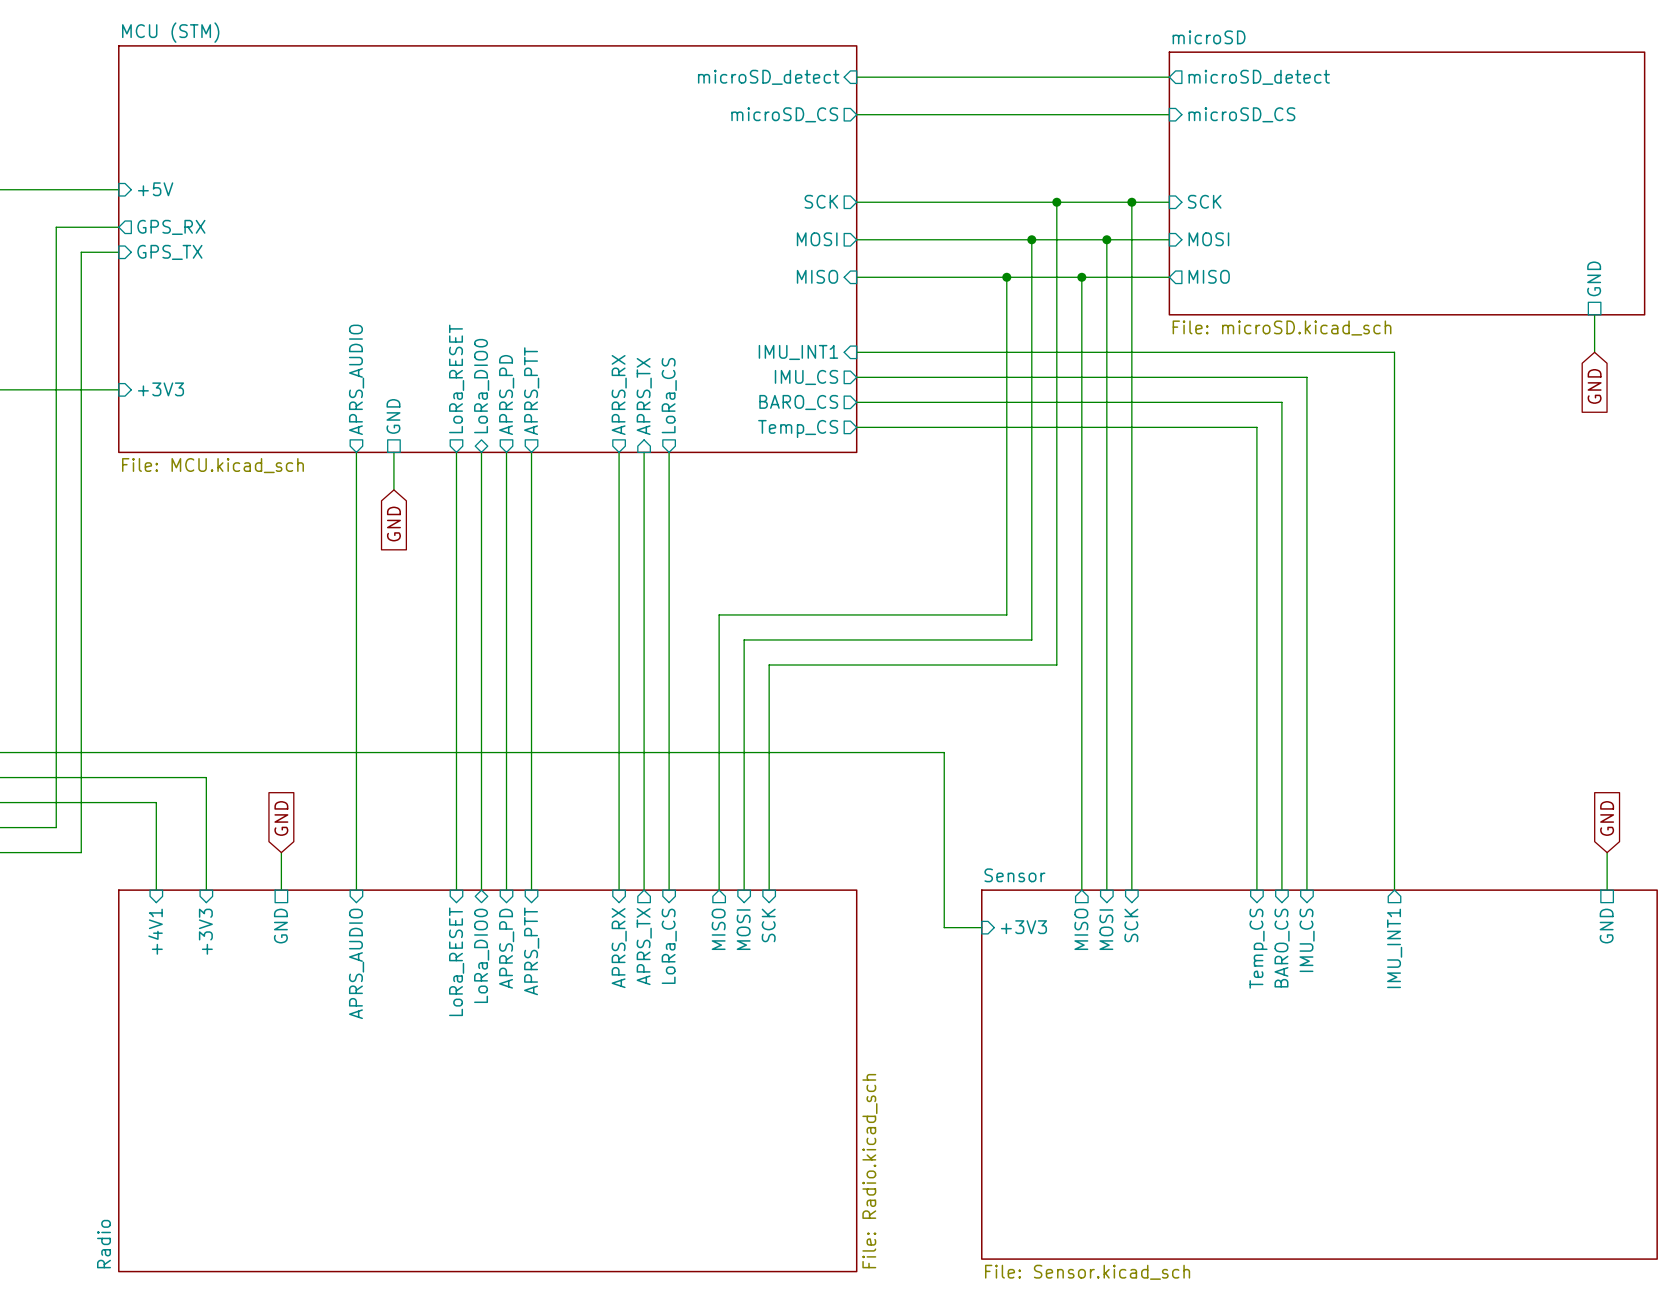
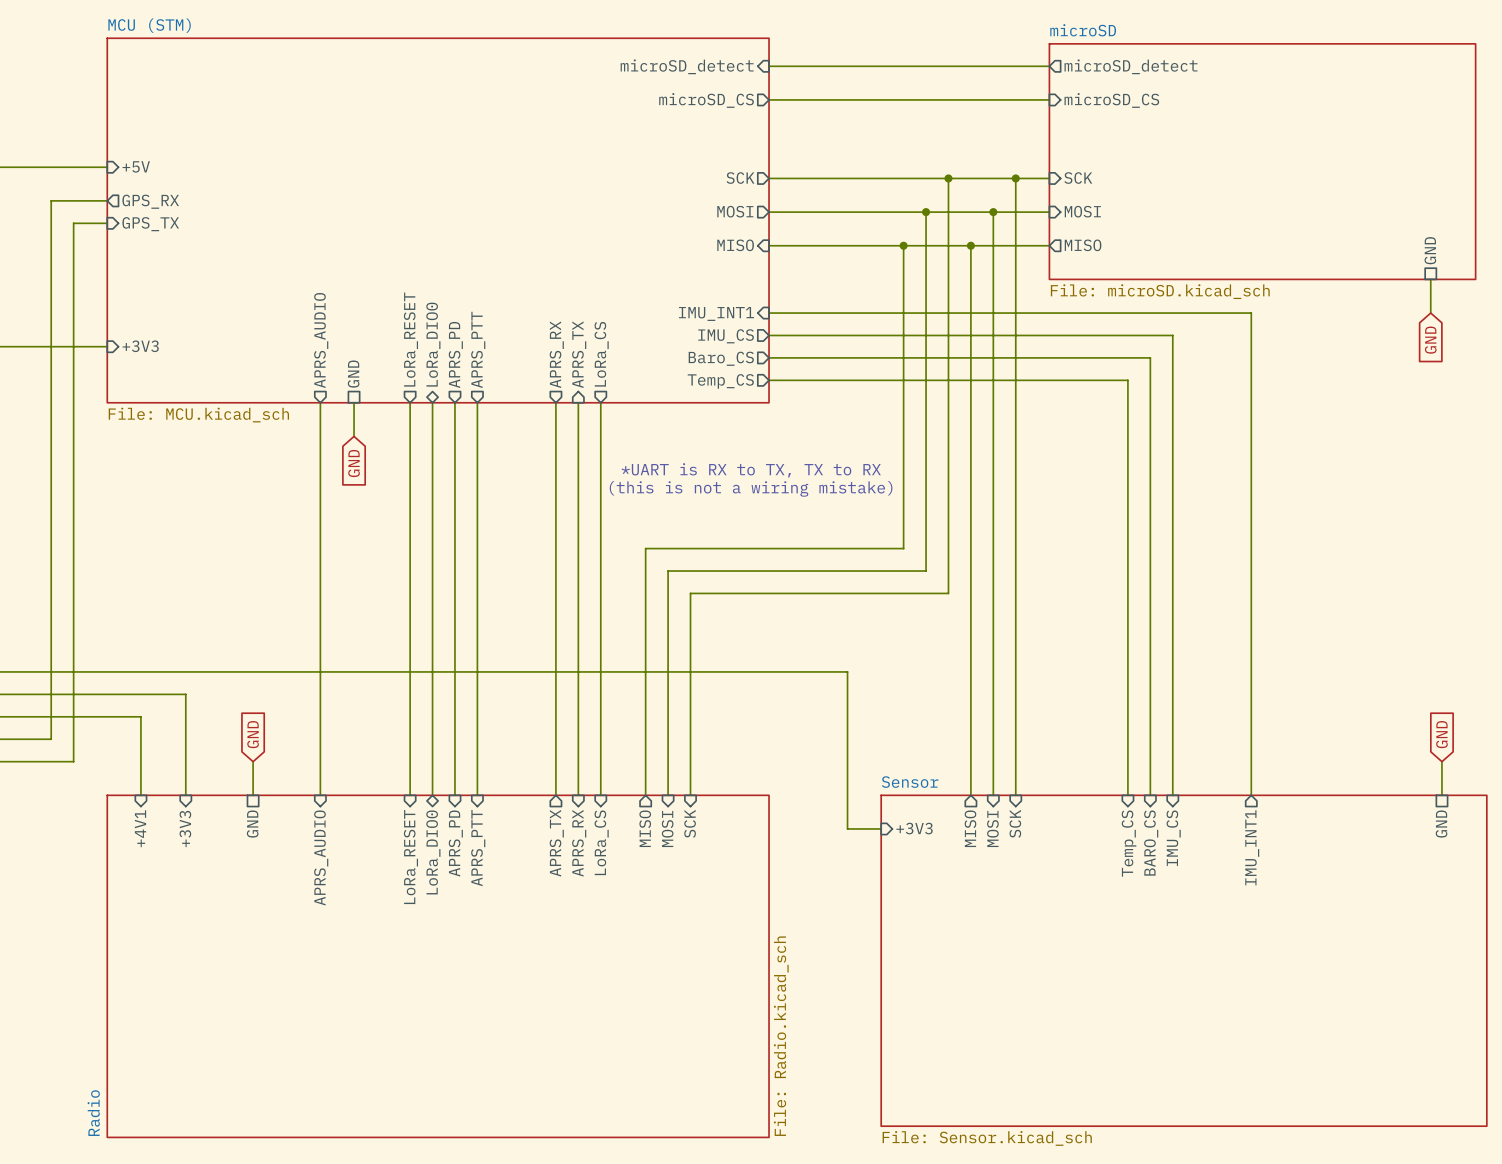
sheet pin: BARO_CS (798, 402) -> Baro_CS (721, 358)
text: none -> *UART is RX to TX, TX to RX (751, 470)
text: none -> (this is not a wiring mistake) (751, 488)
sheet pin shape: output (644, 946) -> input (579, 843)
sheet pin: APRS_TX (644, 946) -> APRS_RX (579, 843)
sheet pin shape: input (619, 948) -> output (556, 843)
sheet pin: APRS_RX (619, 948) -> APRS_TX (556, 843)

